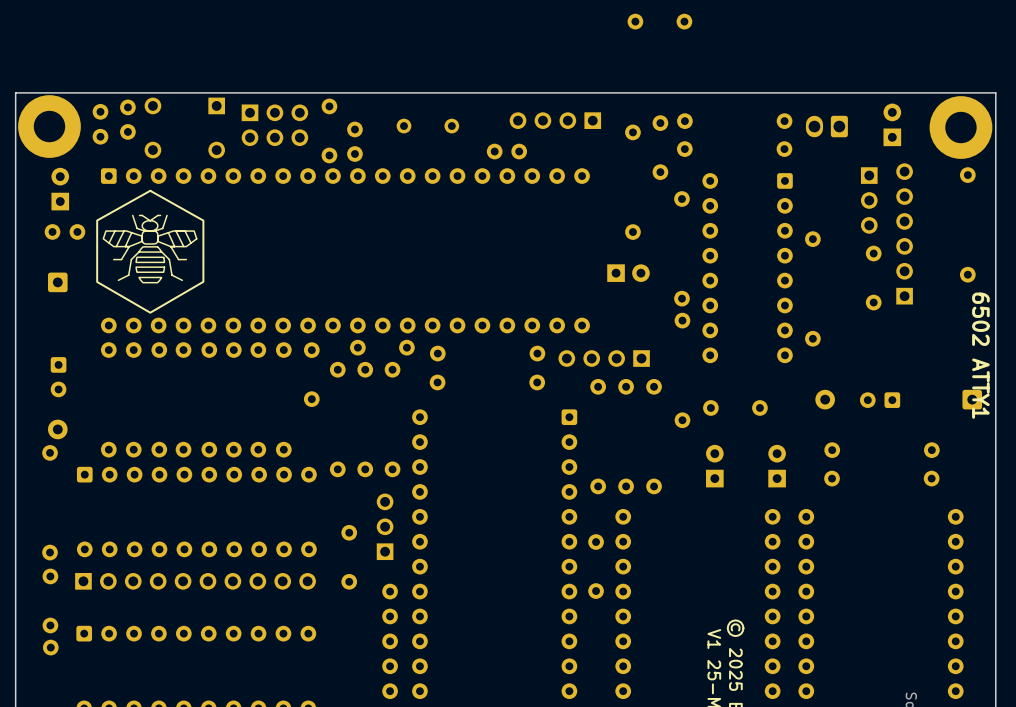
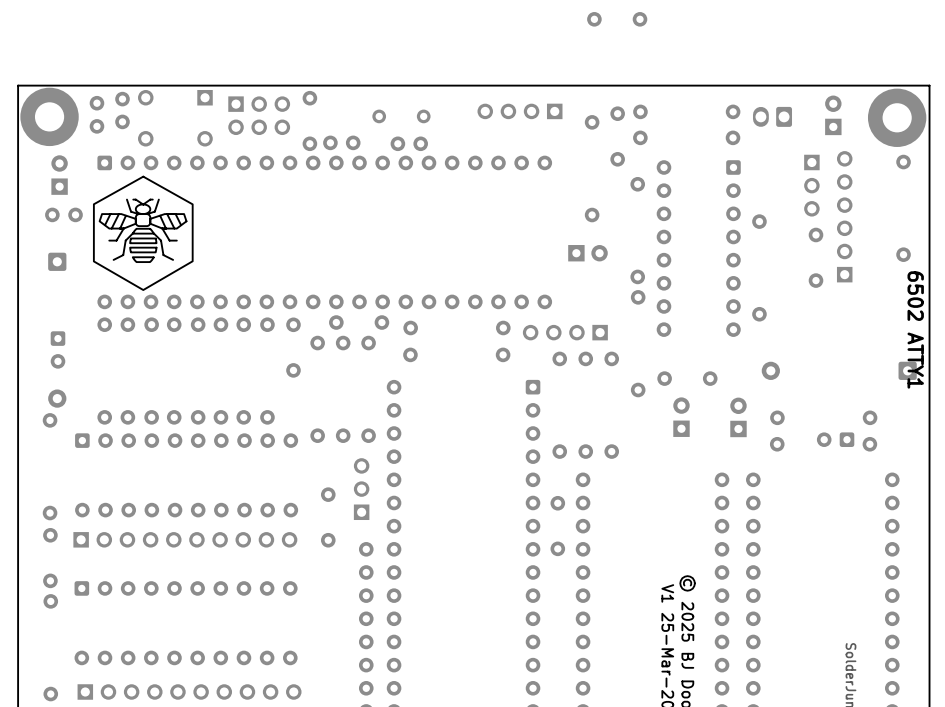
part rotation: 0° (354, 141) -> 90° clockwise (341, 142)
part: (506, 151) -> none
part: none -> (409, 143)
part position: (880, 400) -> (835, 439)
part position: (714, 466) -> (681, 417)
part position: (777, 466) -> (738, 417)

